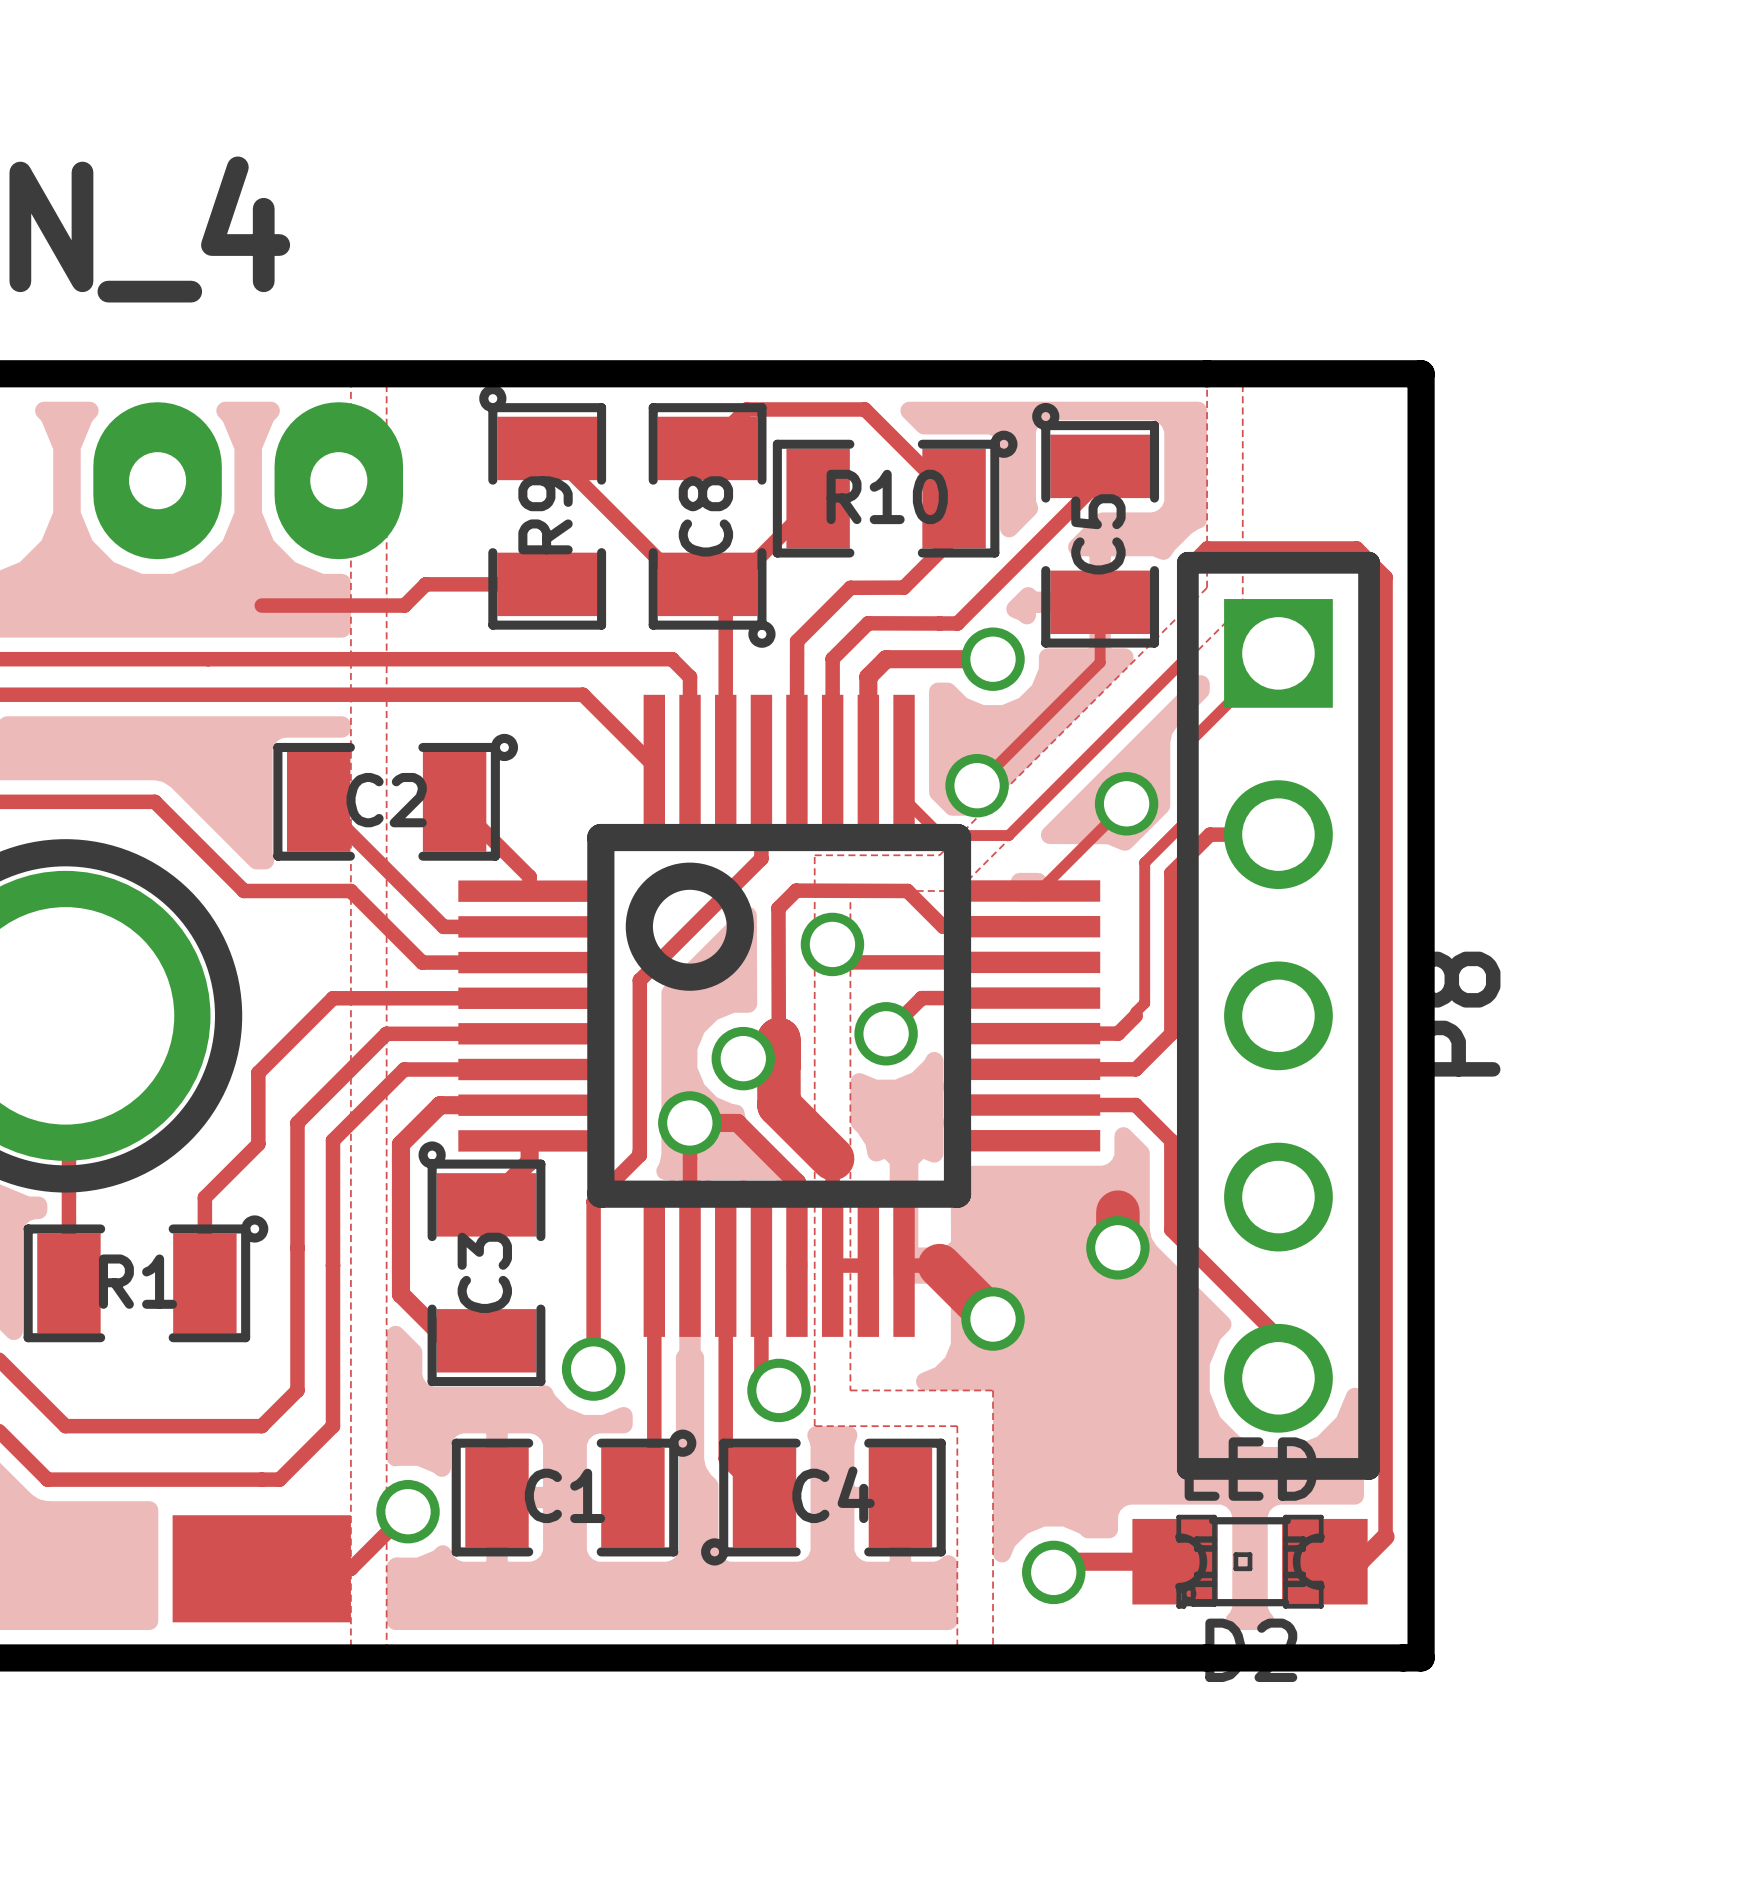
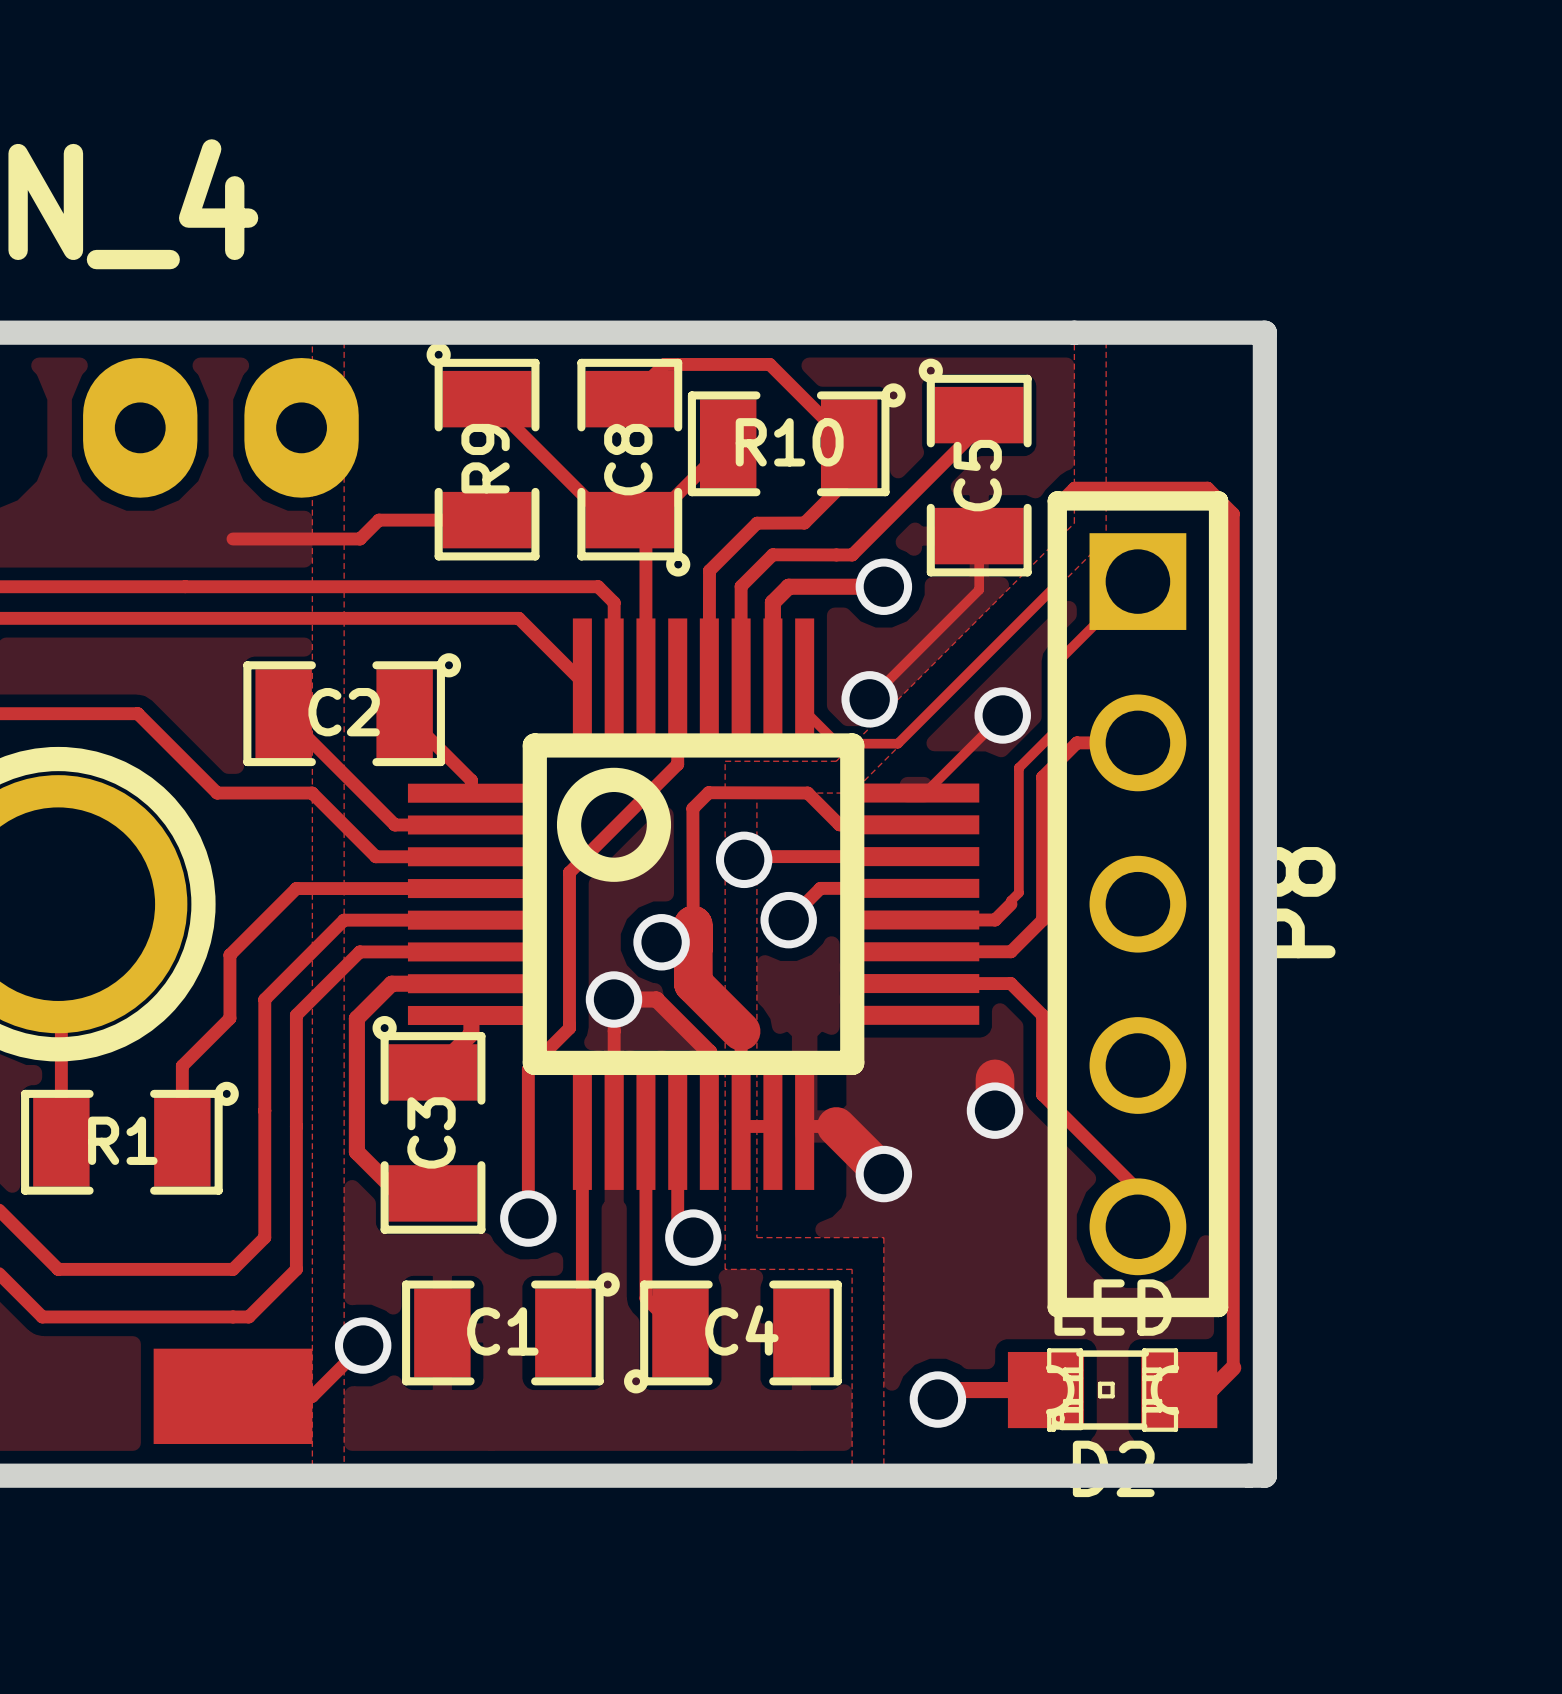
via position: (832, 944) -> (744, 859)

